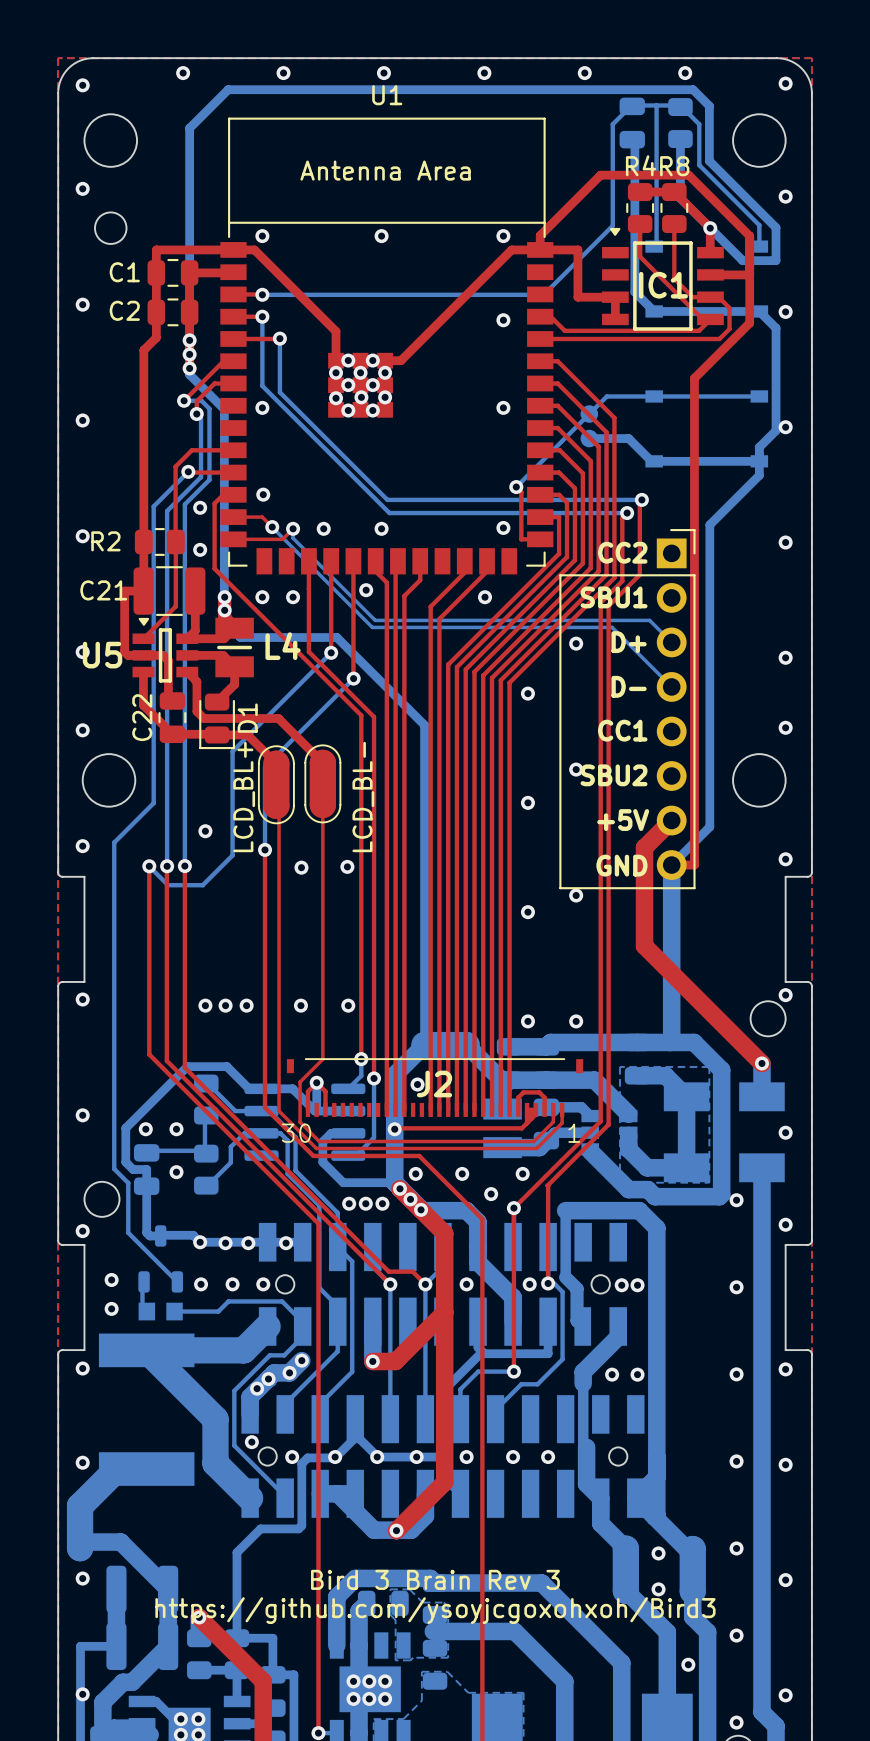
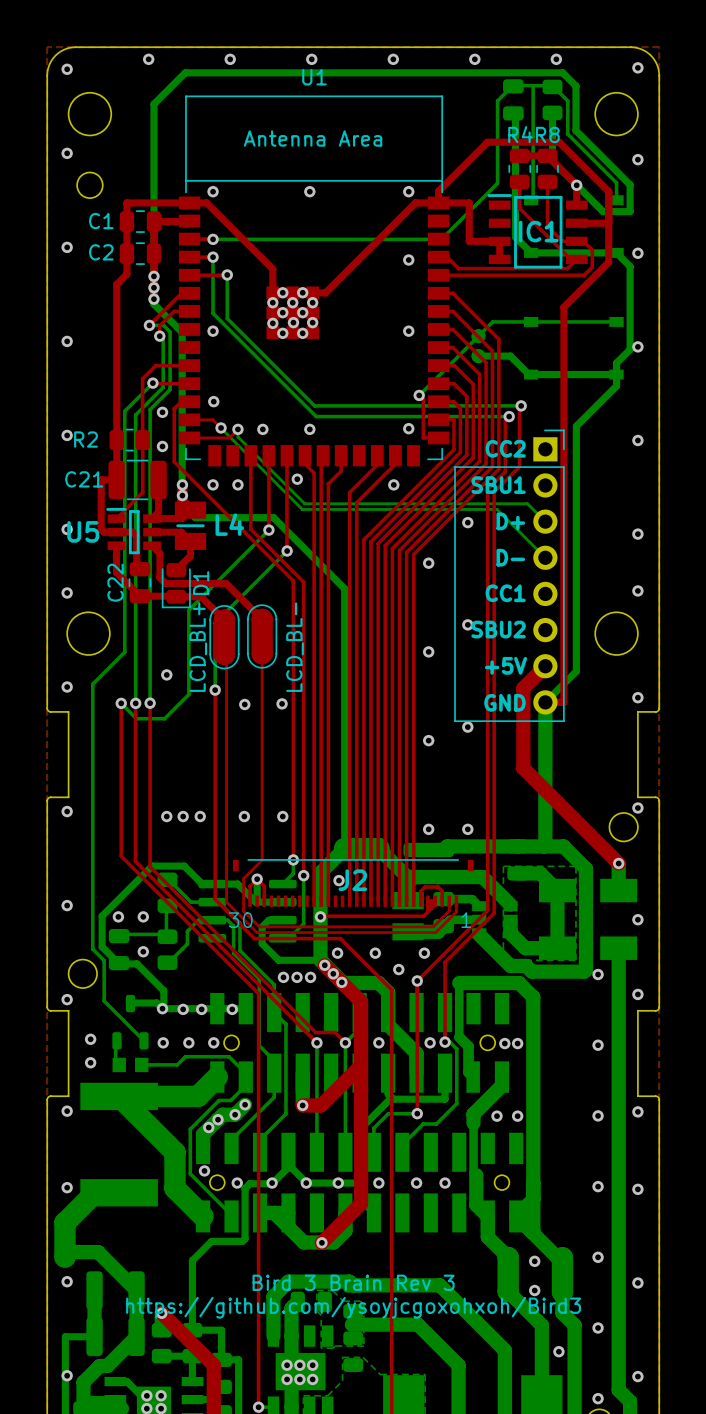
IC1 footprint: [602, 227, 724, 331] -> [487, 194, 588, 269]
U5 footprint: [132, 617, 199, 683] -> [106, 507, 161, 555]
bottom track: (125, 1162) (133, 1169) (146, 1169) (146, 1232) (150, 1235) (160, 1235) -> (102, 943) (102, 946) (119, 963) (136, 963) (163, 990) (163, 1008)

